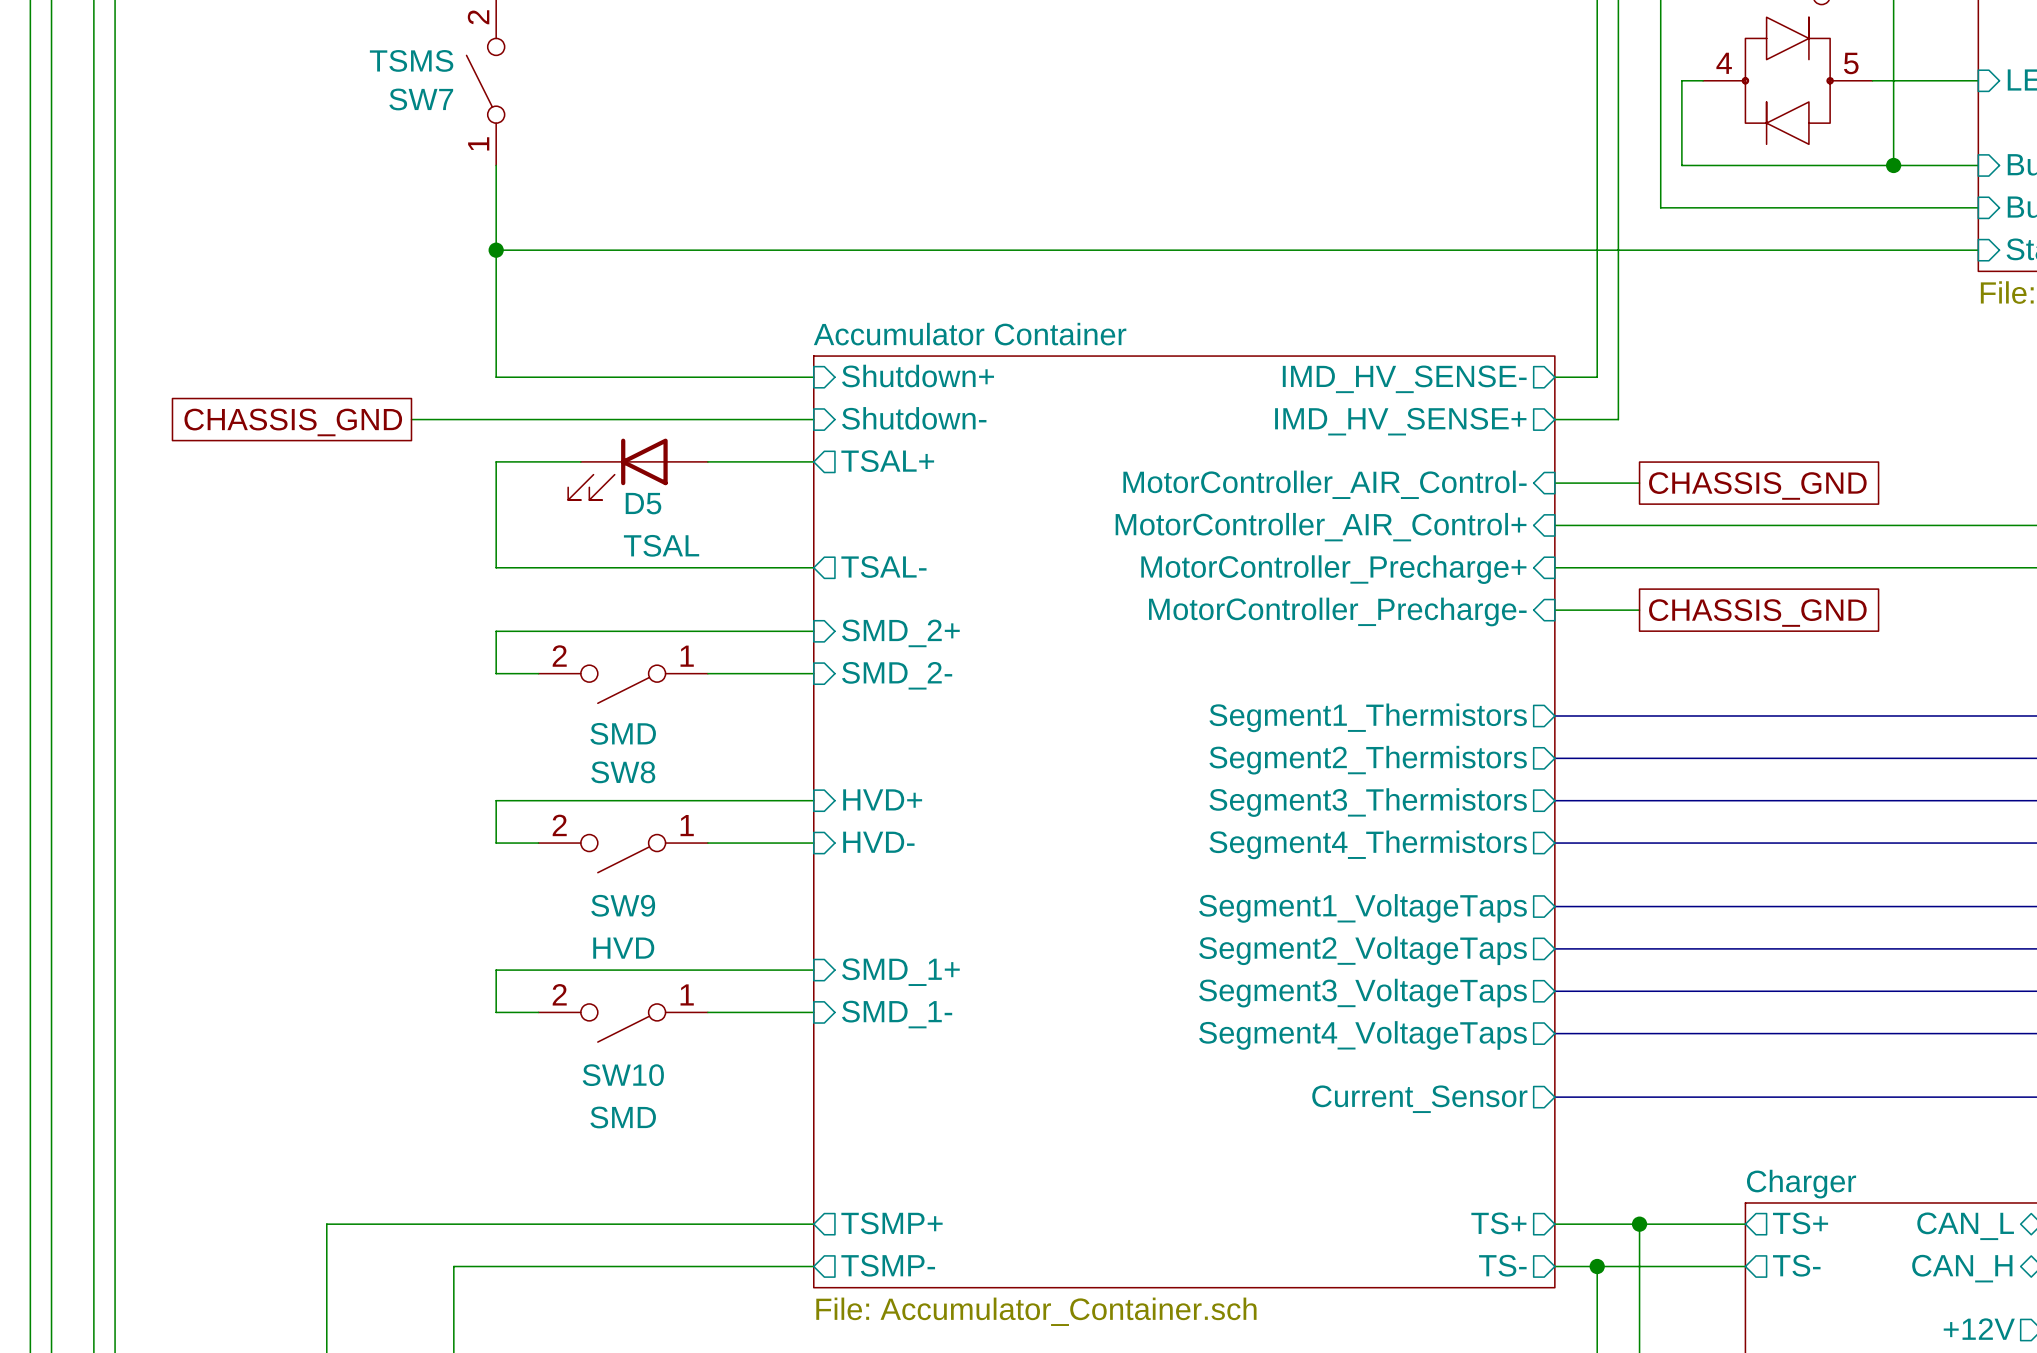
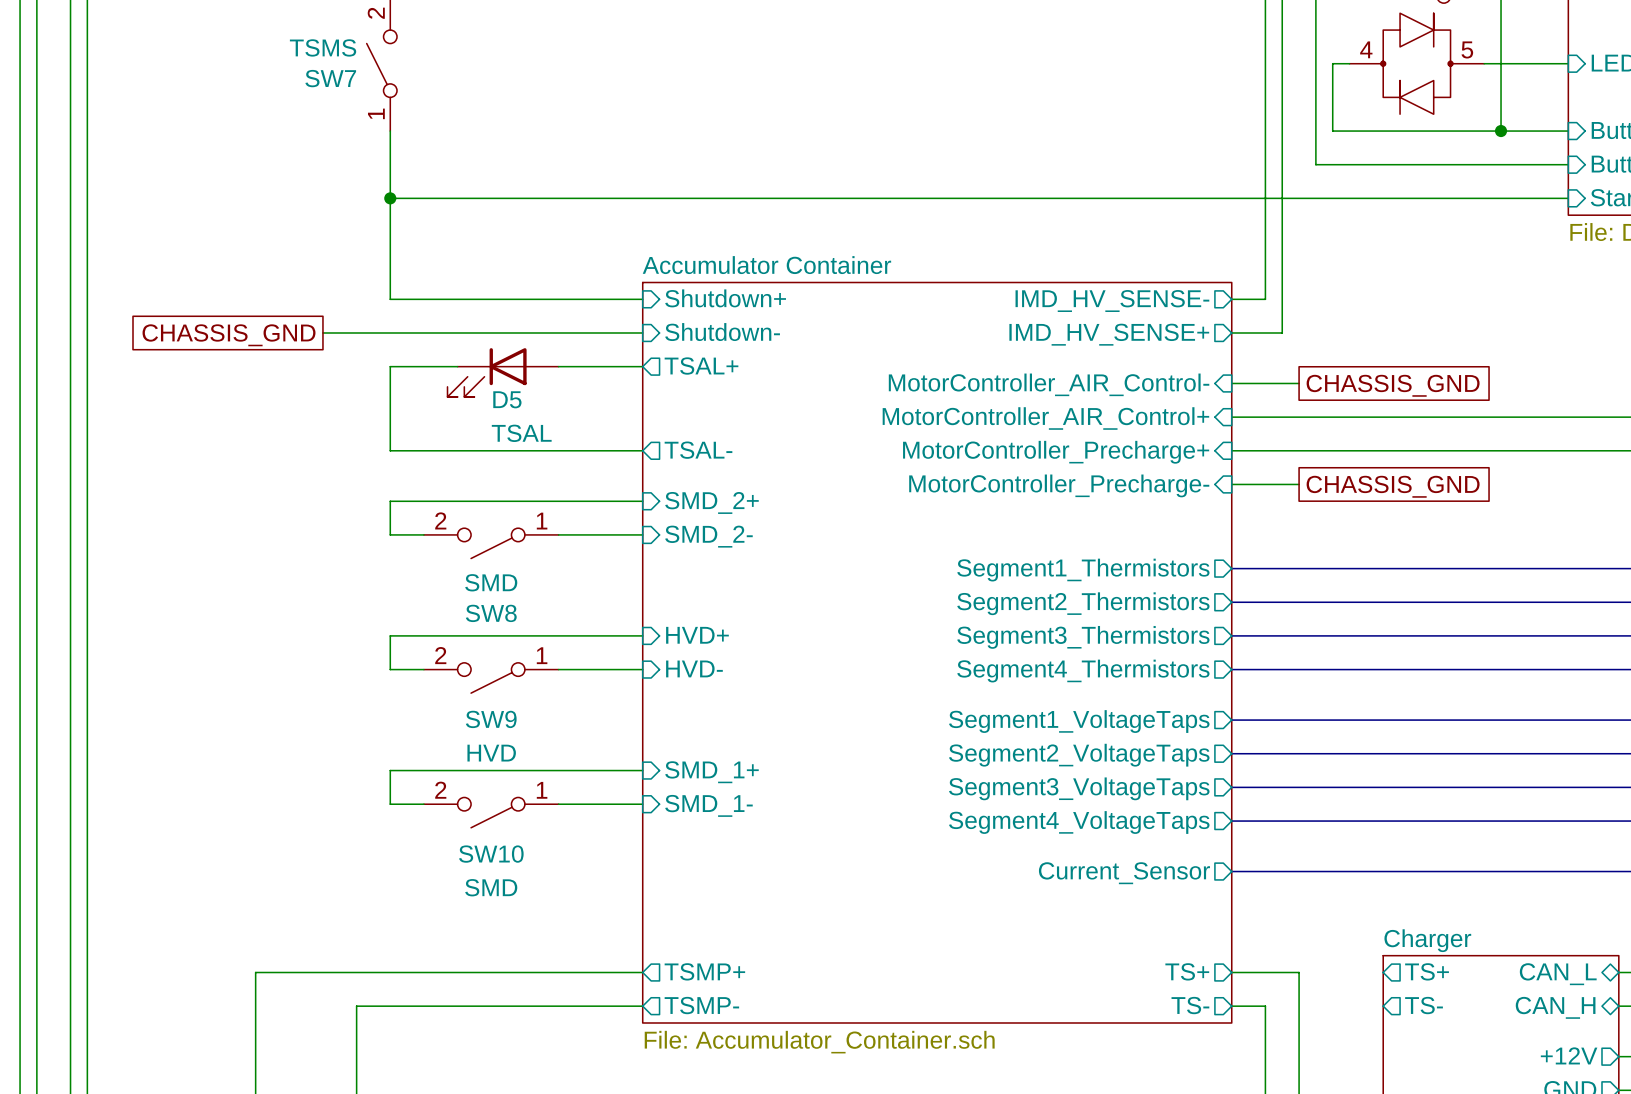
wire: (1639, 1224) (1745, 1224) -> none
junction: (1639, 1224) -> none
wire: (1597, 1266) (1745, 1266) -> none
junction: (1597, 1266) -> none

